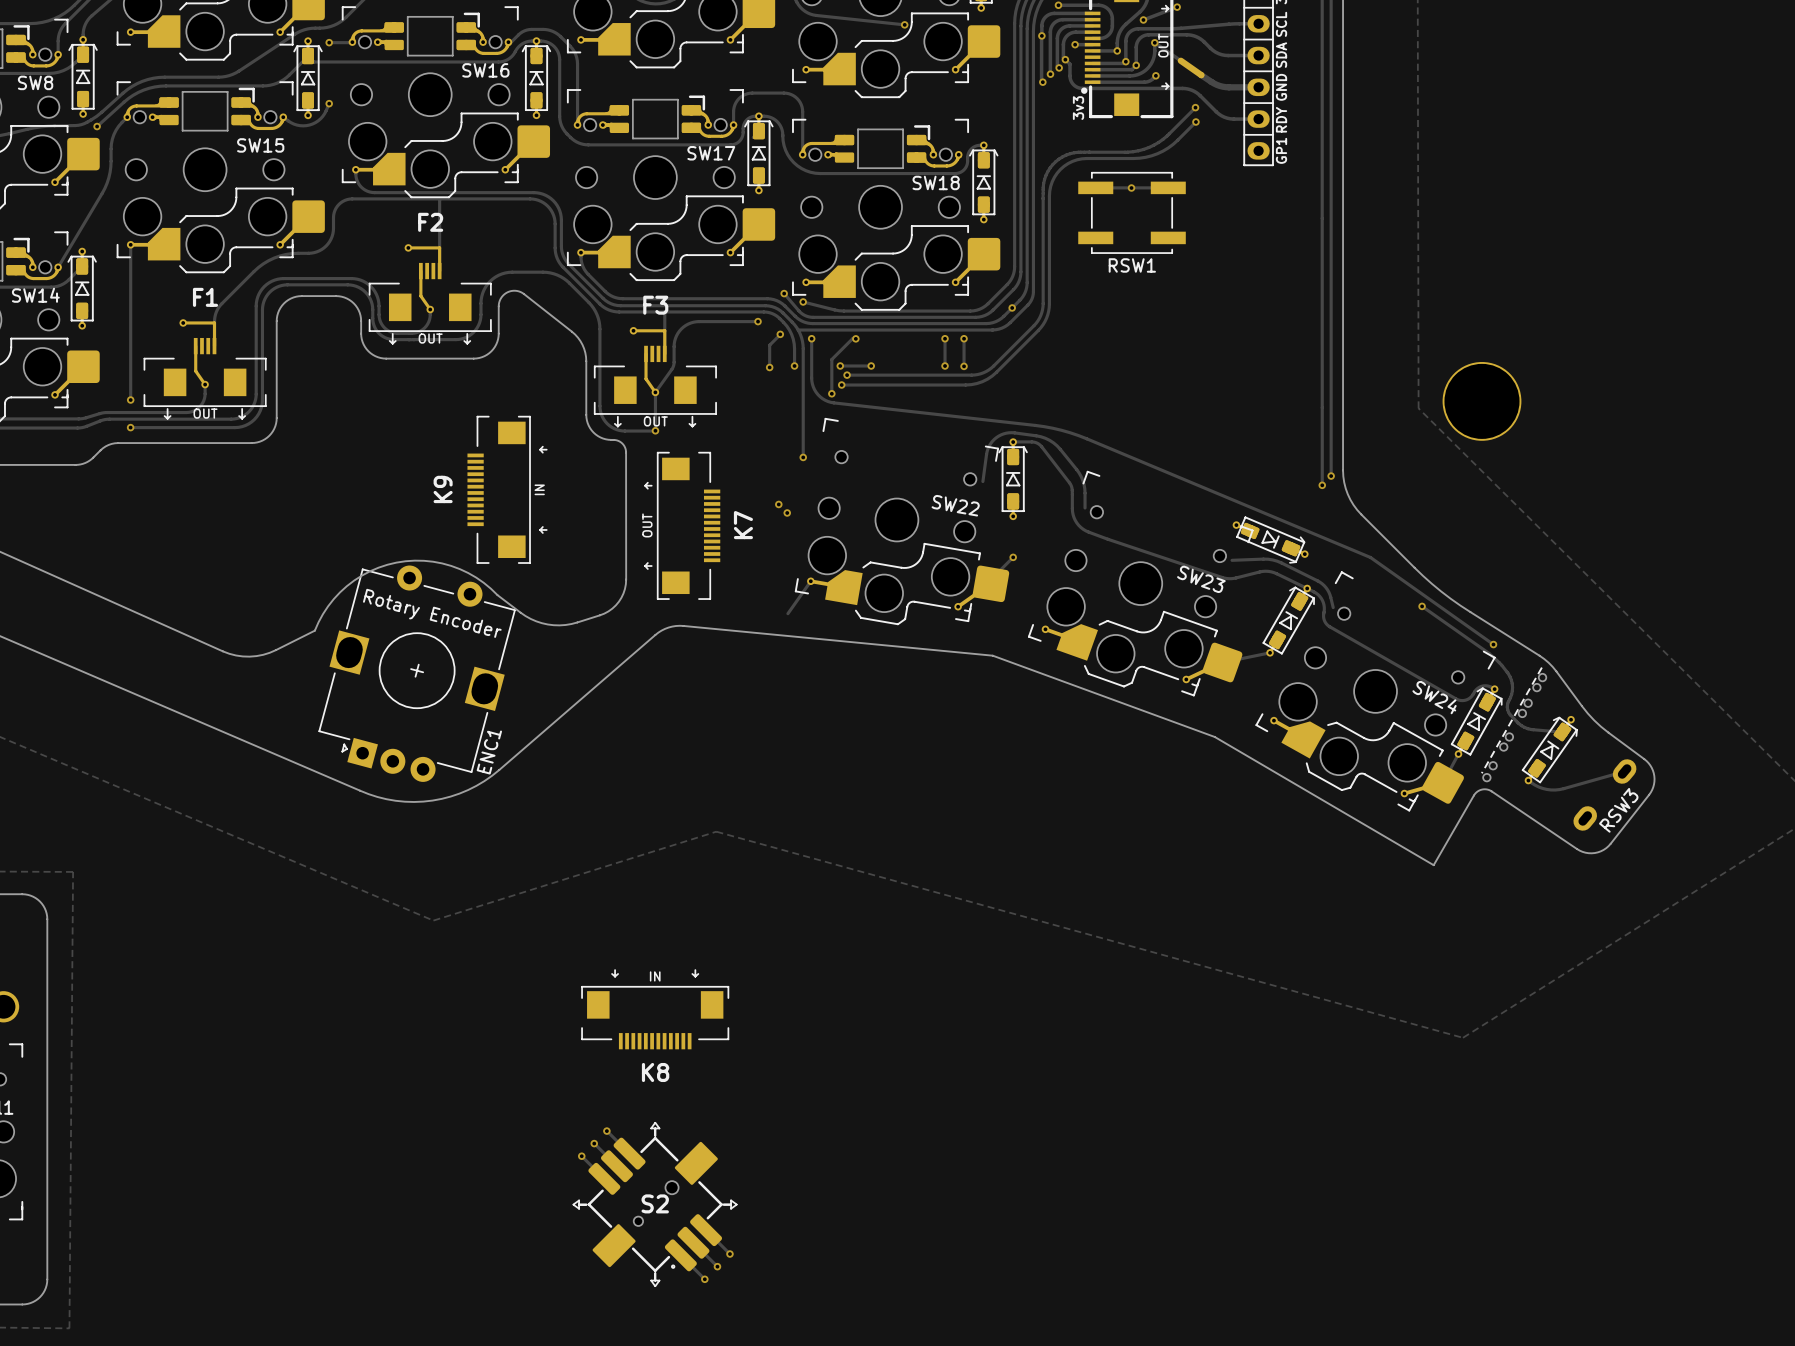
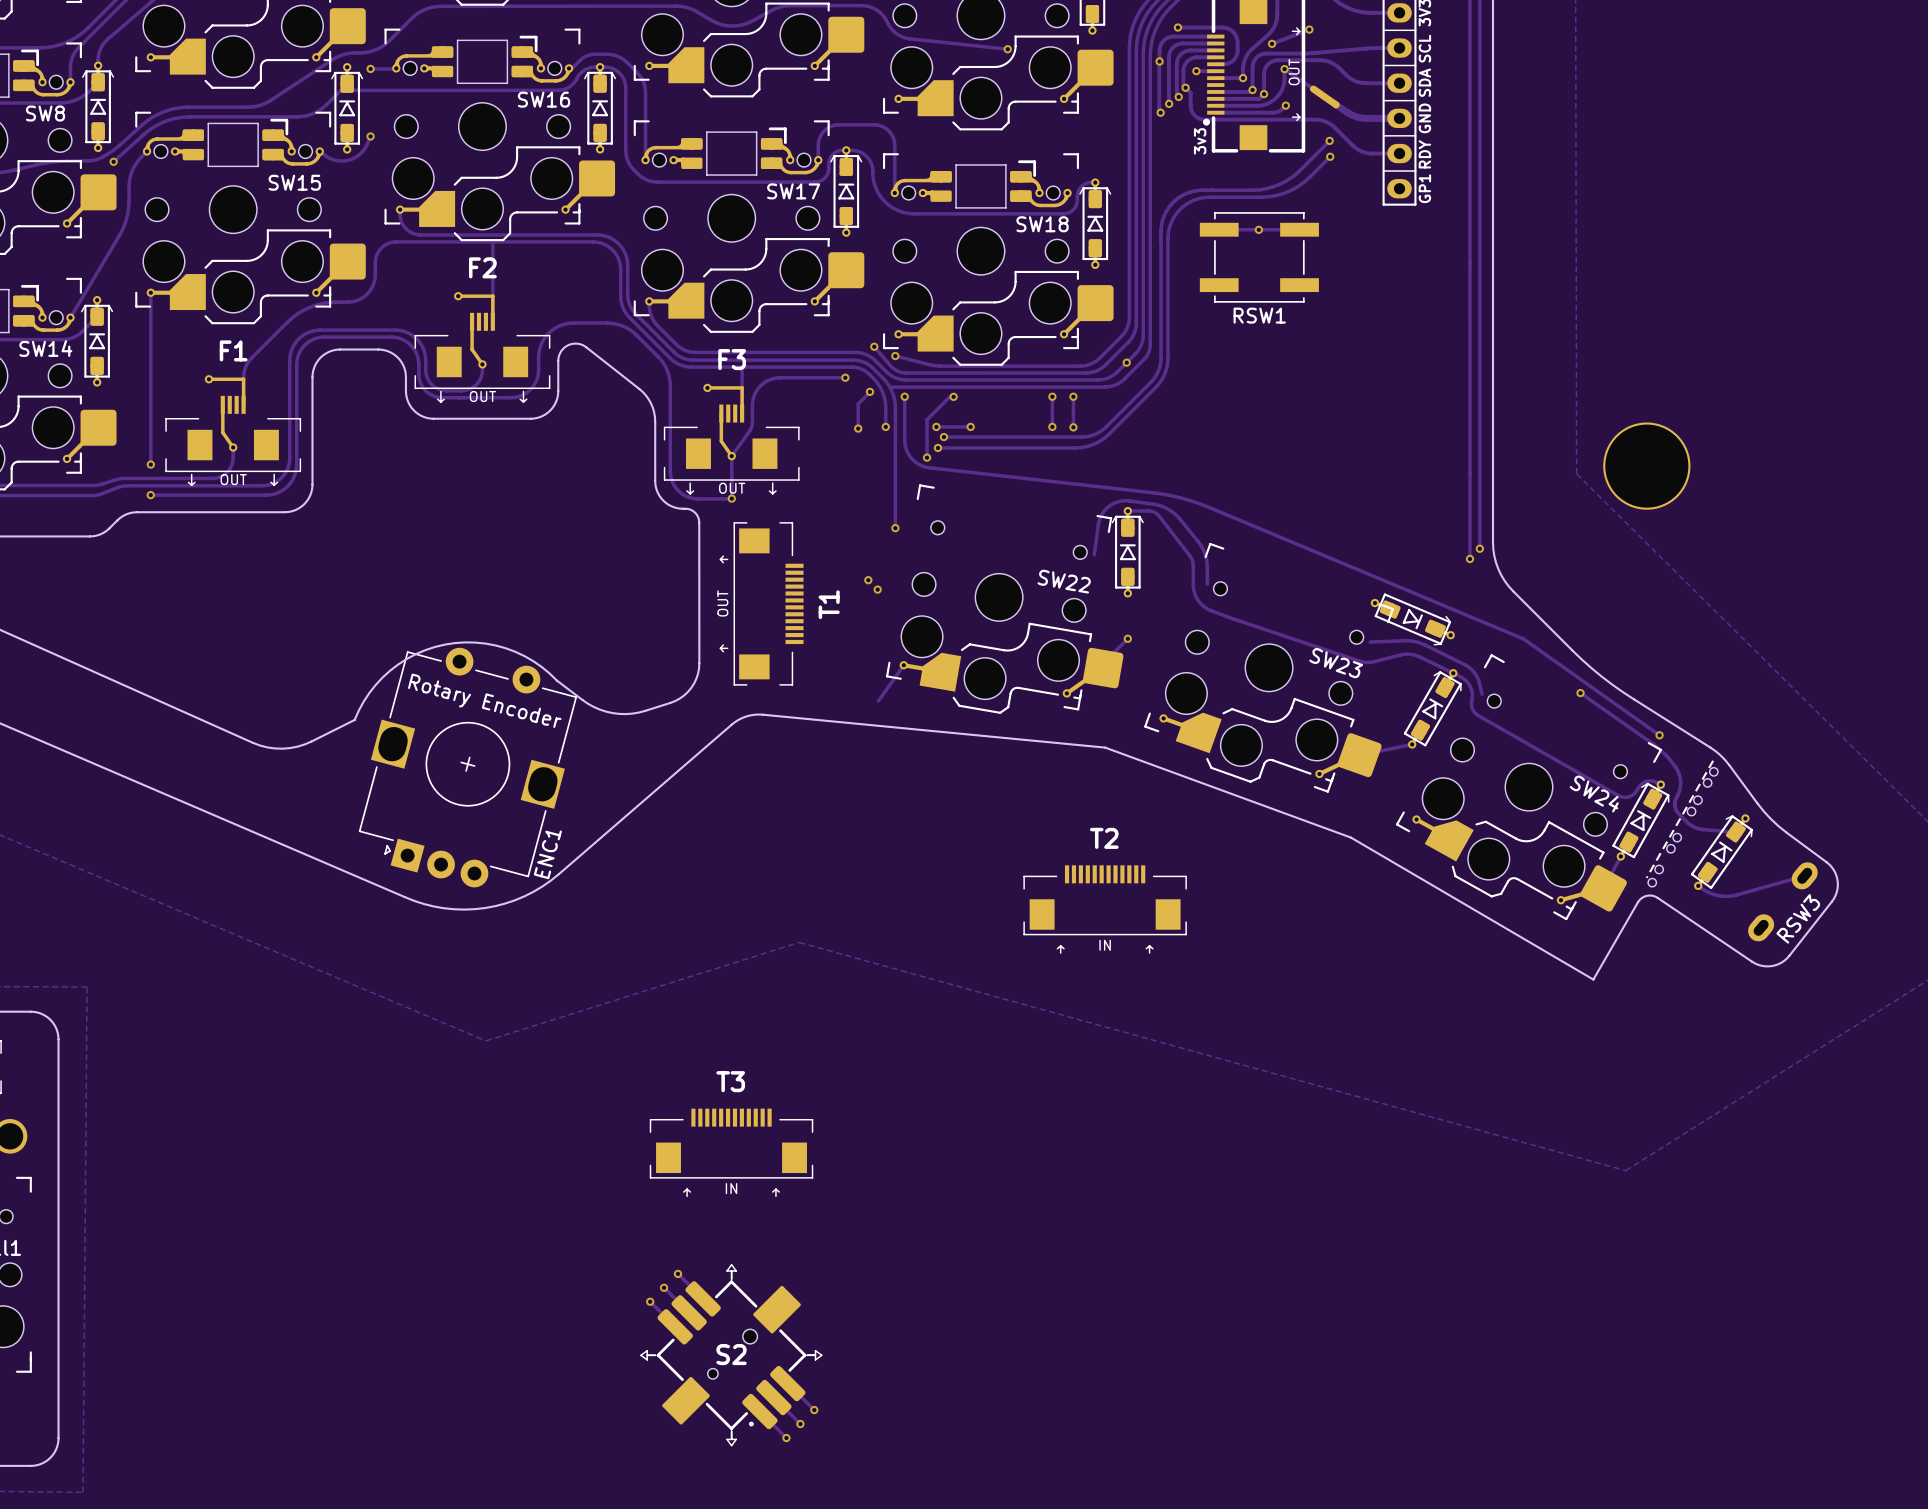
K9: (507, 489) -> none
K7 name: K7 (743, 525) -> T1 (829, 604)
T2: none -> (1105, 909)
K8: (655, 1009) -> none
T3: none -> (731, 1152)

